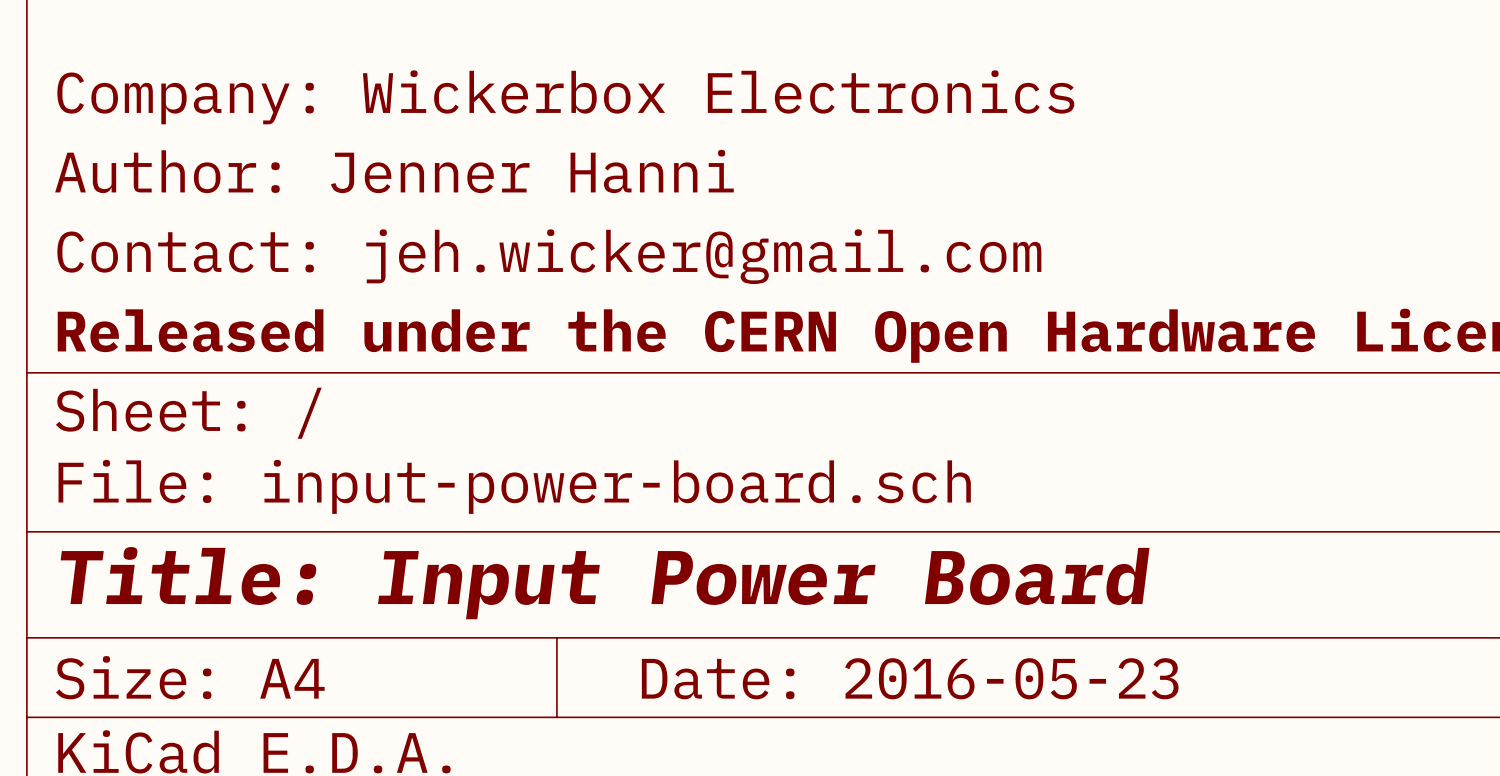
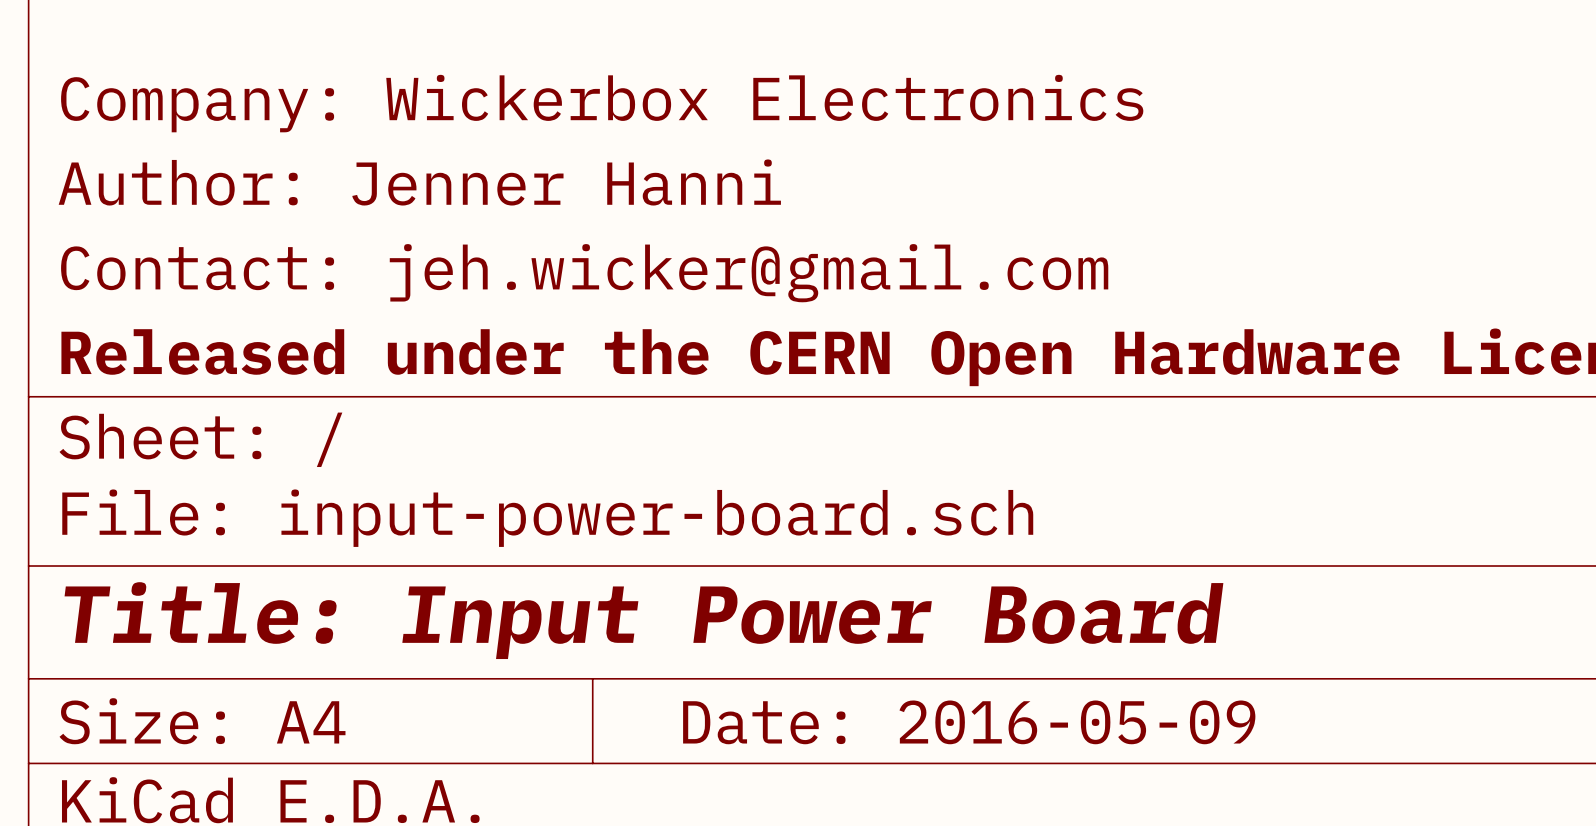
title block: Date: 2016-05-23 (910, 678) -> Date: 2016-05-09 (969, 722)

